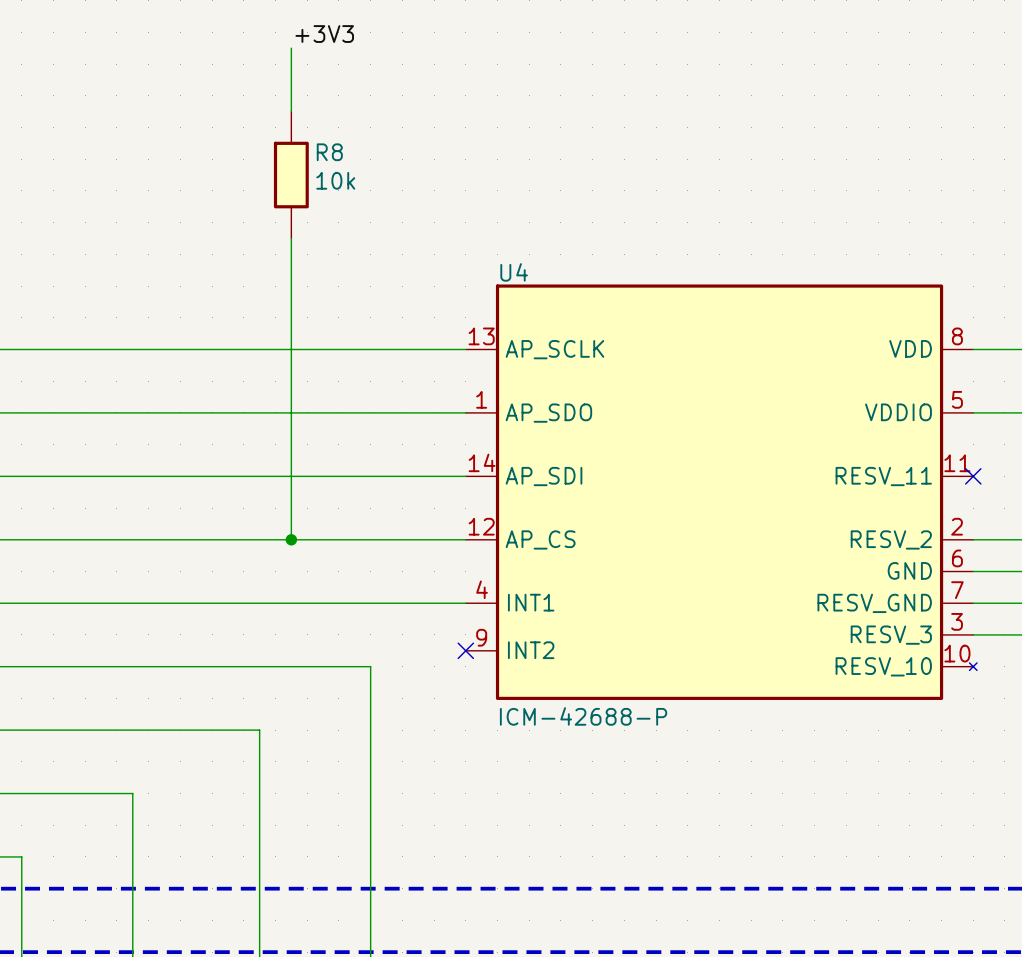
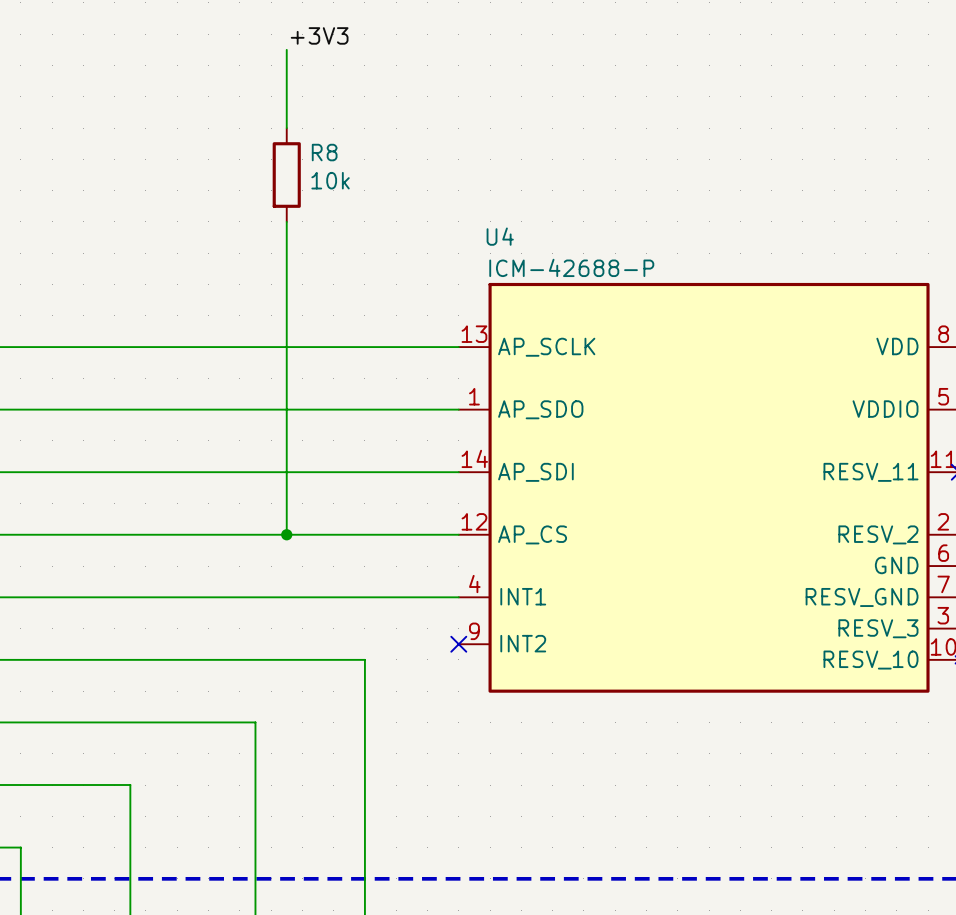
R8 symbol: [273, 111, 309, 239] -> [272, 128, 301, 222]
U4 name position: U4 (514, 272) -> U4 (500, 236)
U4 value position: ICM-42688-P (583, 716) -> ICM-42688-P (571, 267)

